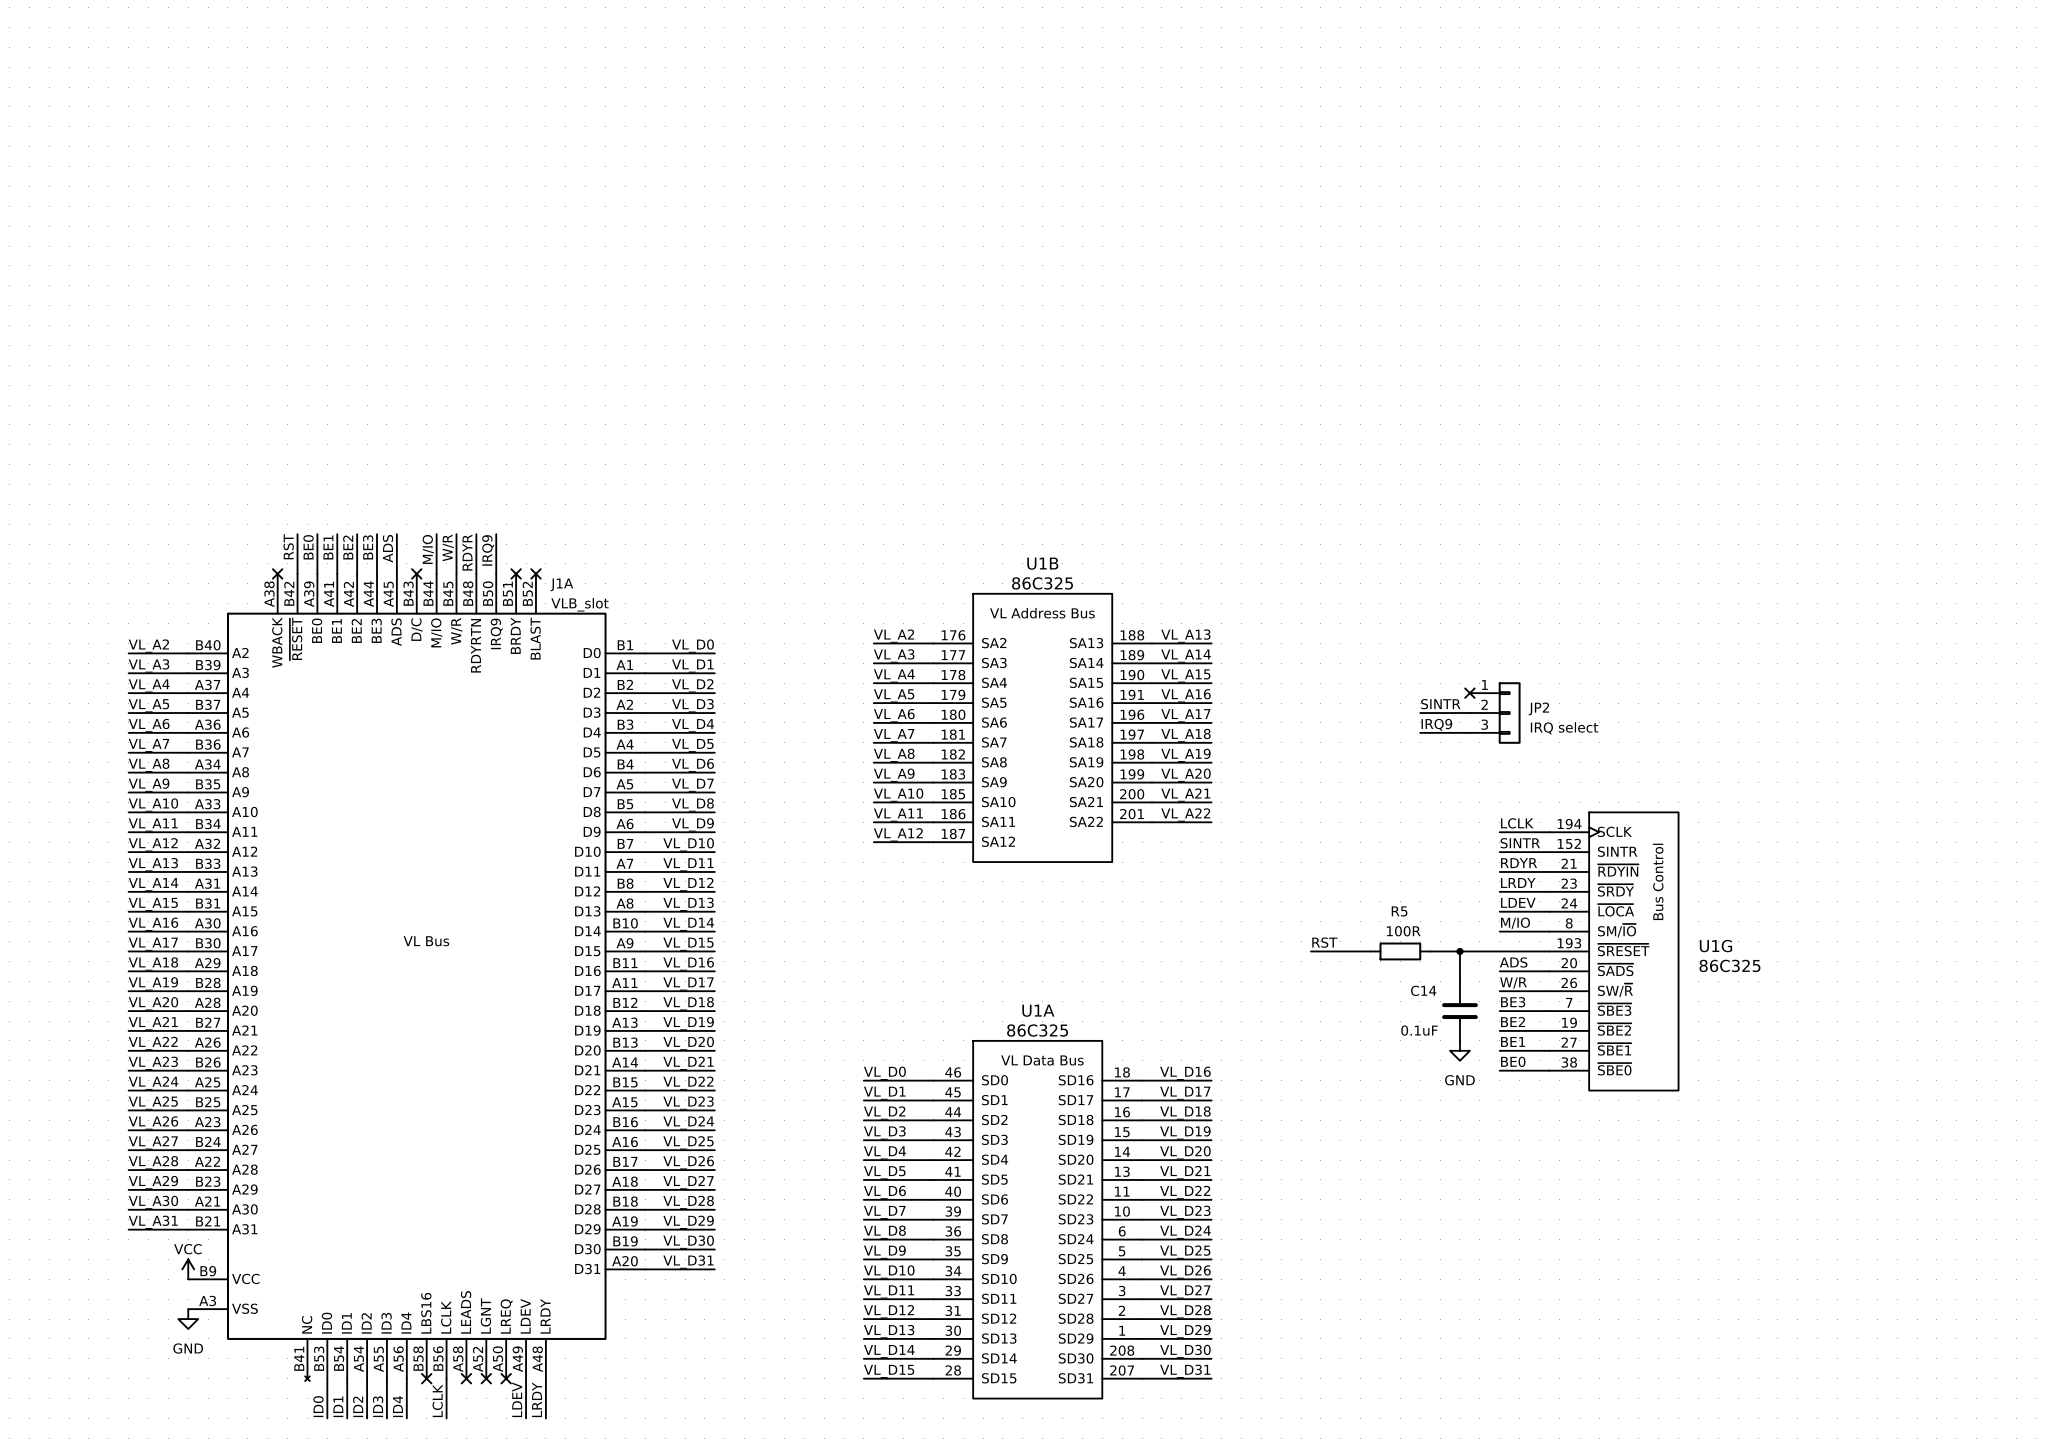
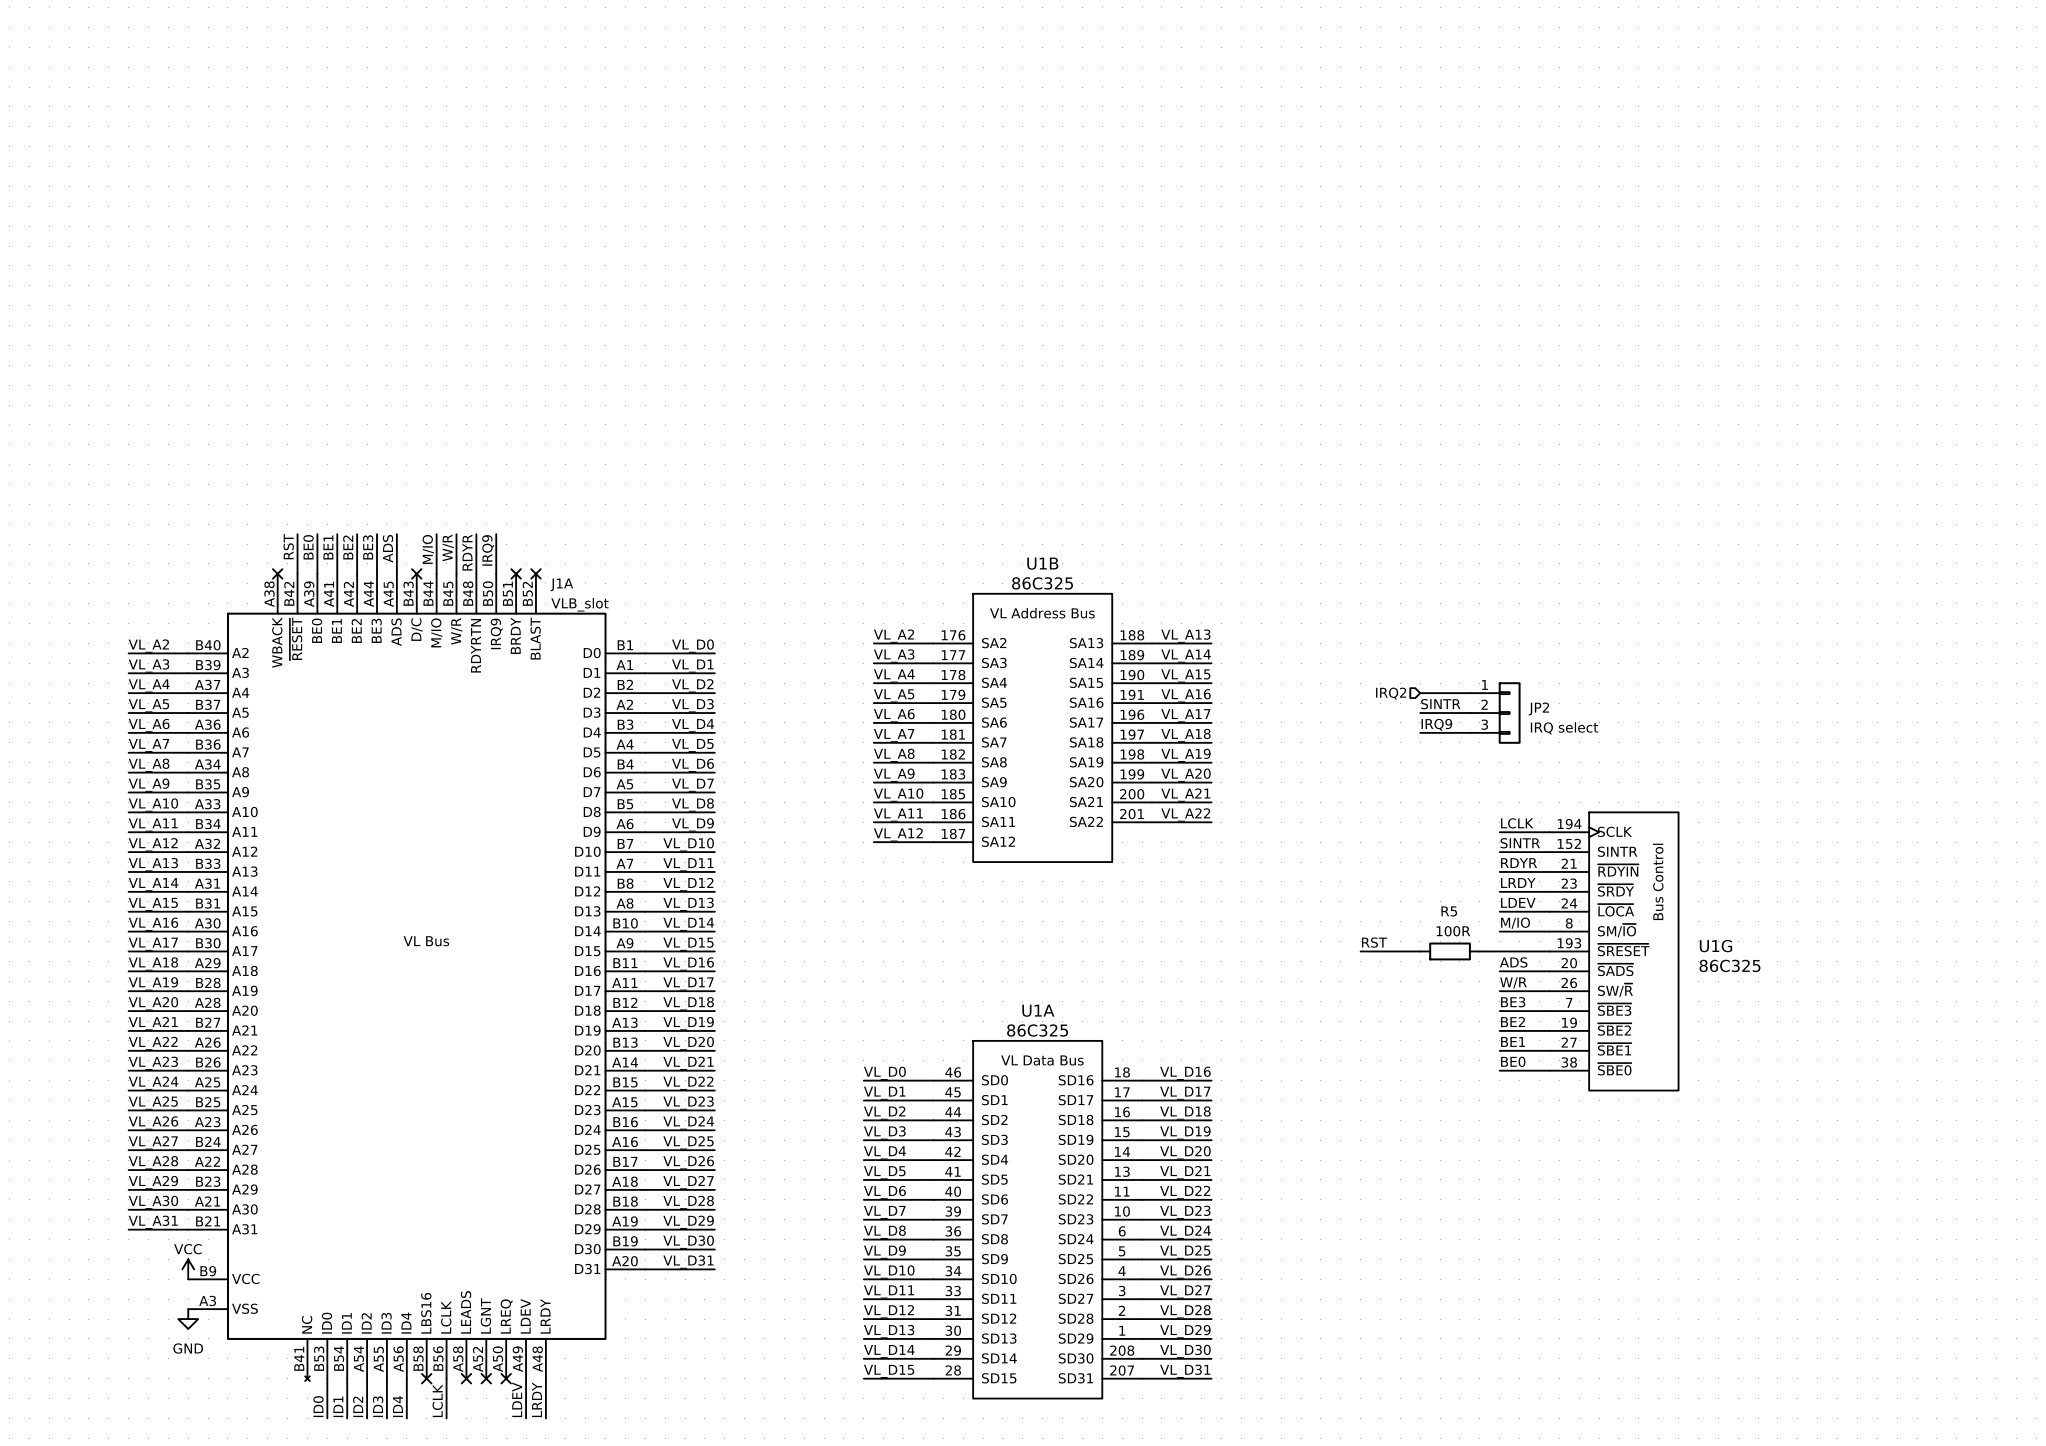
hierarchical label: none -> IRQ2 (1391, 693)
wire: none -> (1420, 693) (1469, 693)
no-connect mark: (1469, 693) -> none
label position: RST (1324, 942) -> RST (1374, 942)
wire: (1310, 951) (1360, 951) -> (1370, 951) (1420, 951)
R5 position: (1400, 951) -> (1450, 951)
wire: (1430, 951) (1479, 951) -> none
wire: (1459, 951) (1459, 981) -> none
junction: (1459, 951) -> none
C14: 0.1uF (1459, 1011) -> none
power symbol: GND (1459, 1050) -> none

